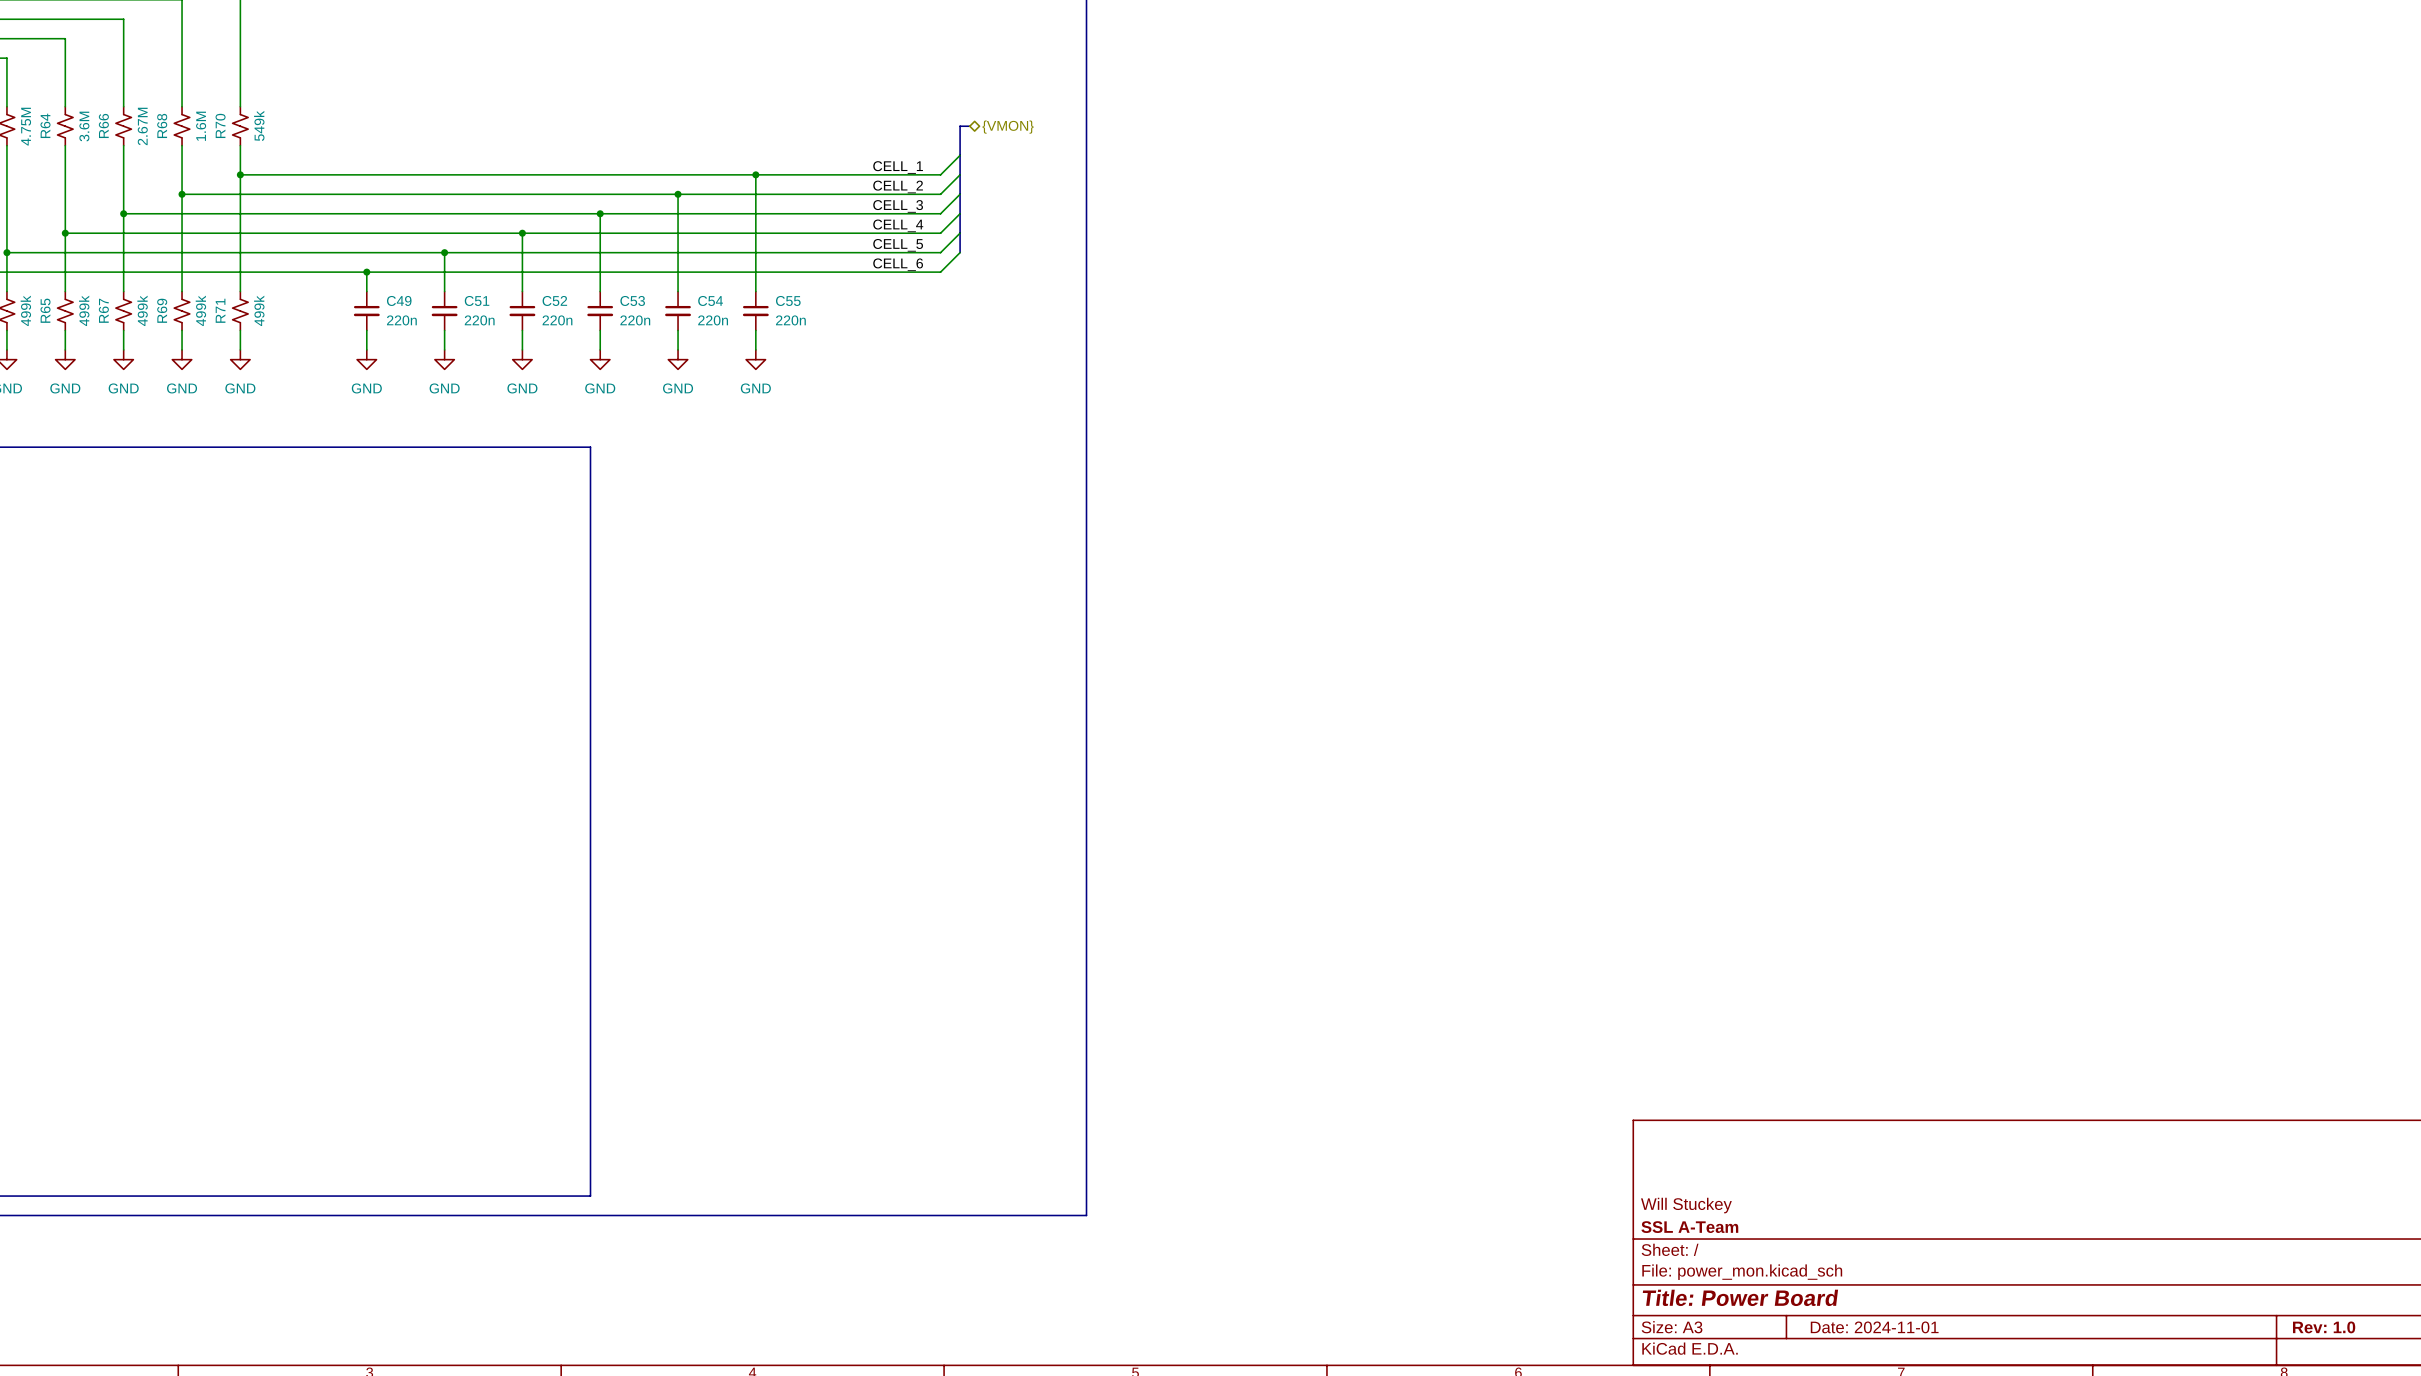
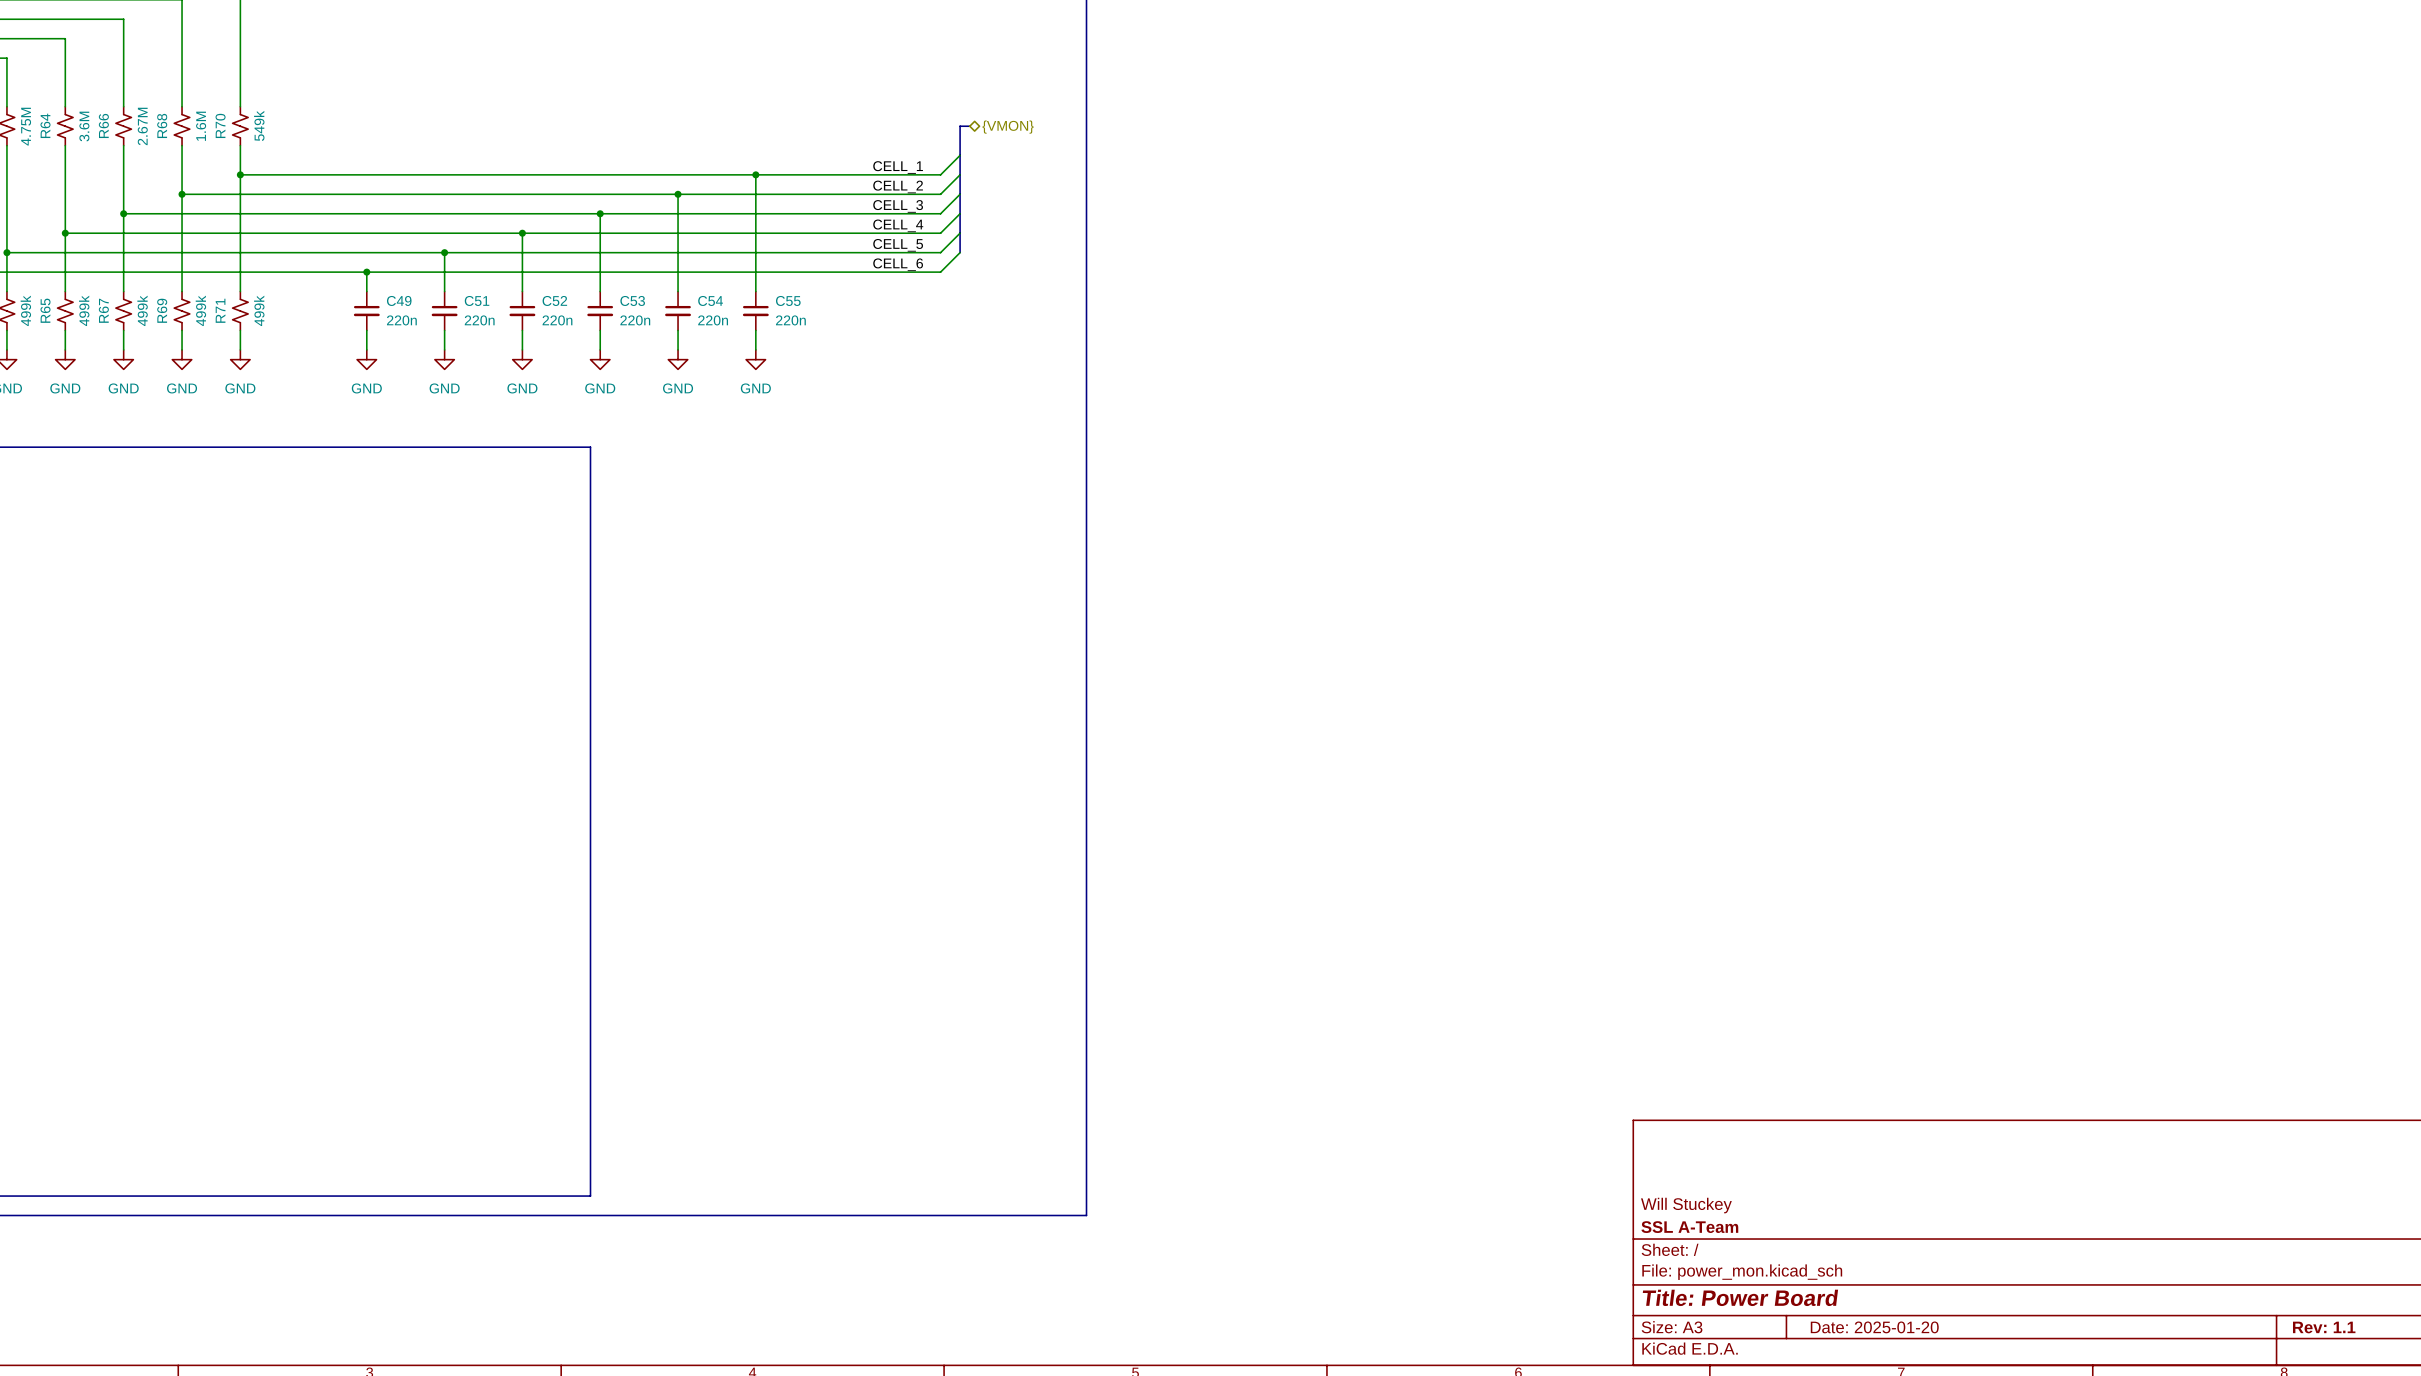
title block: Date: 2024-11-01 (1874, 1327) -> Date: 2025-01-20 (1874, 1327)
title block: Rev: 1.0 (2324, 1327) -> Rev: 1.1 (2324, 1327)

